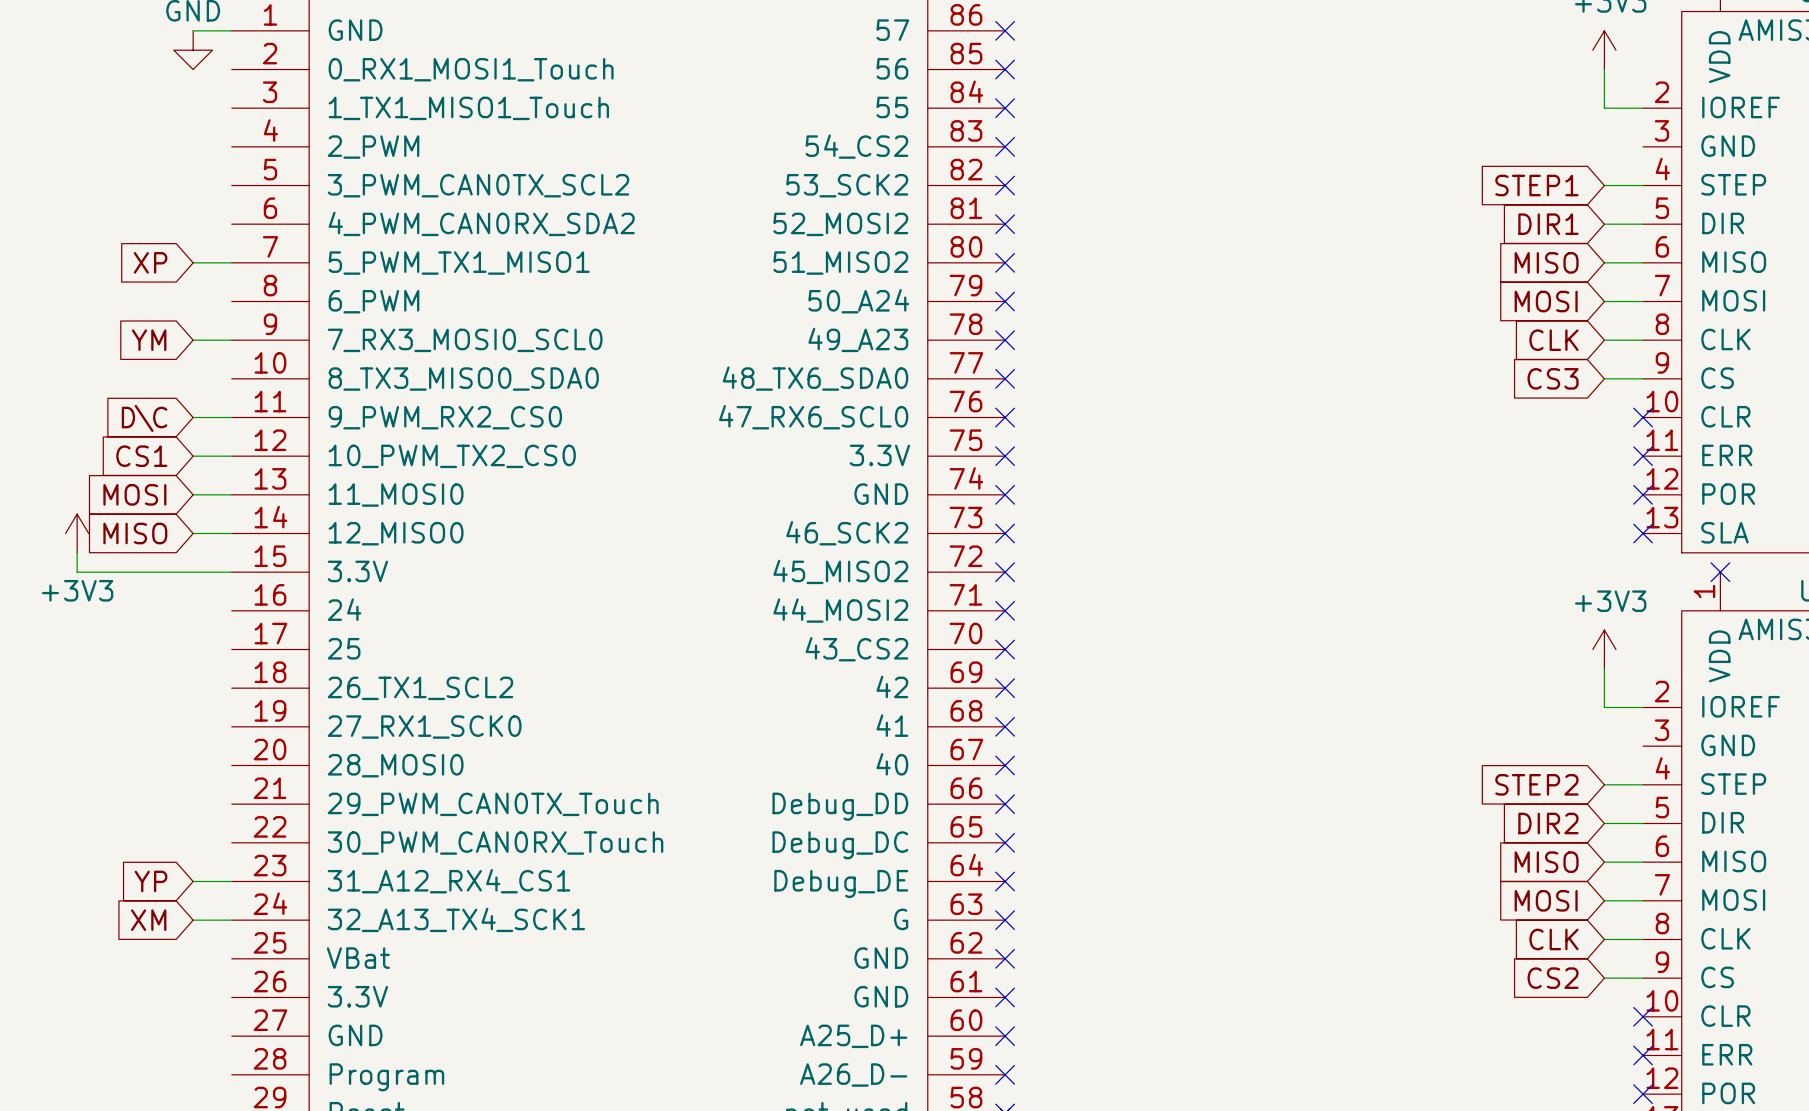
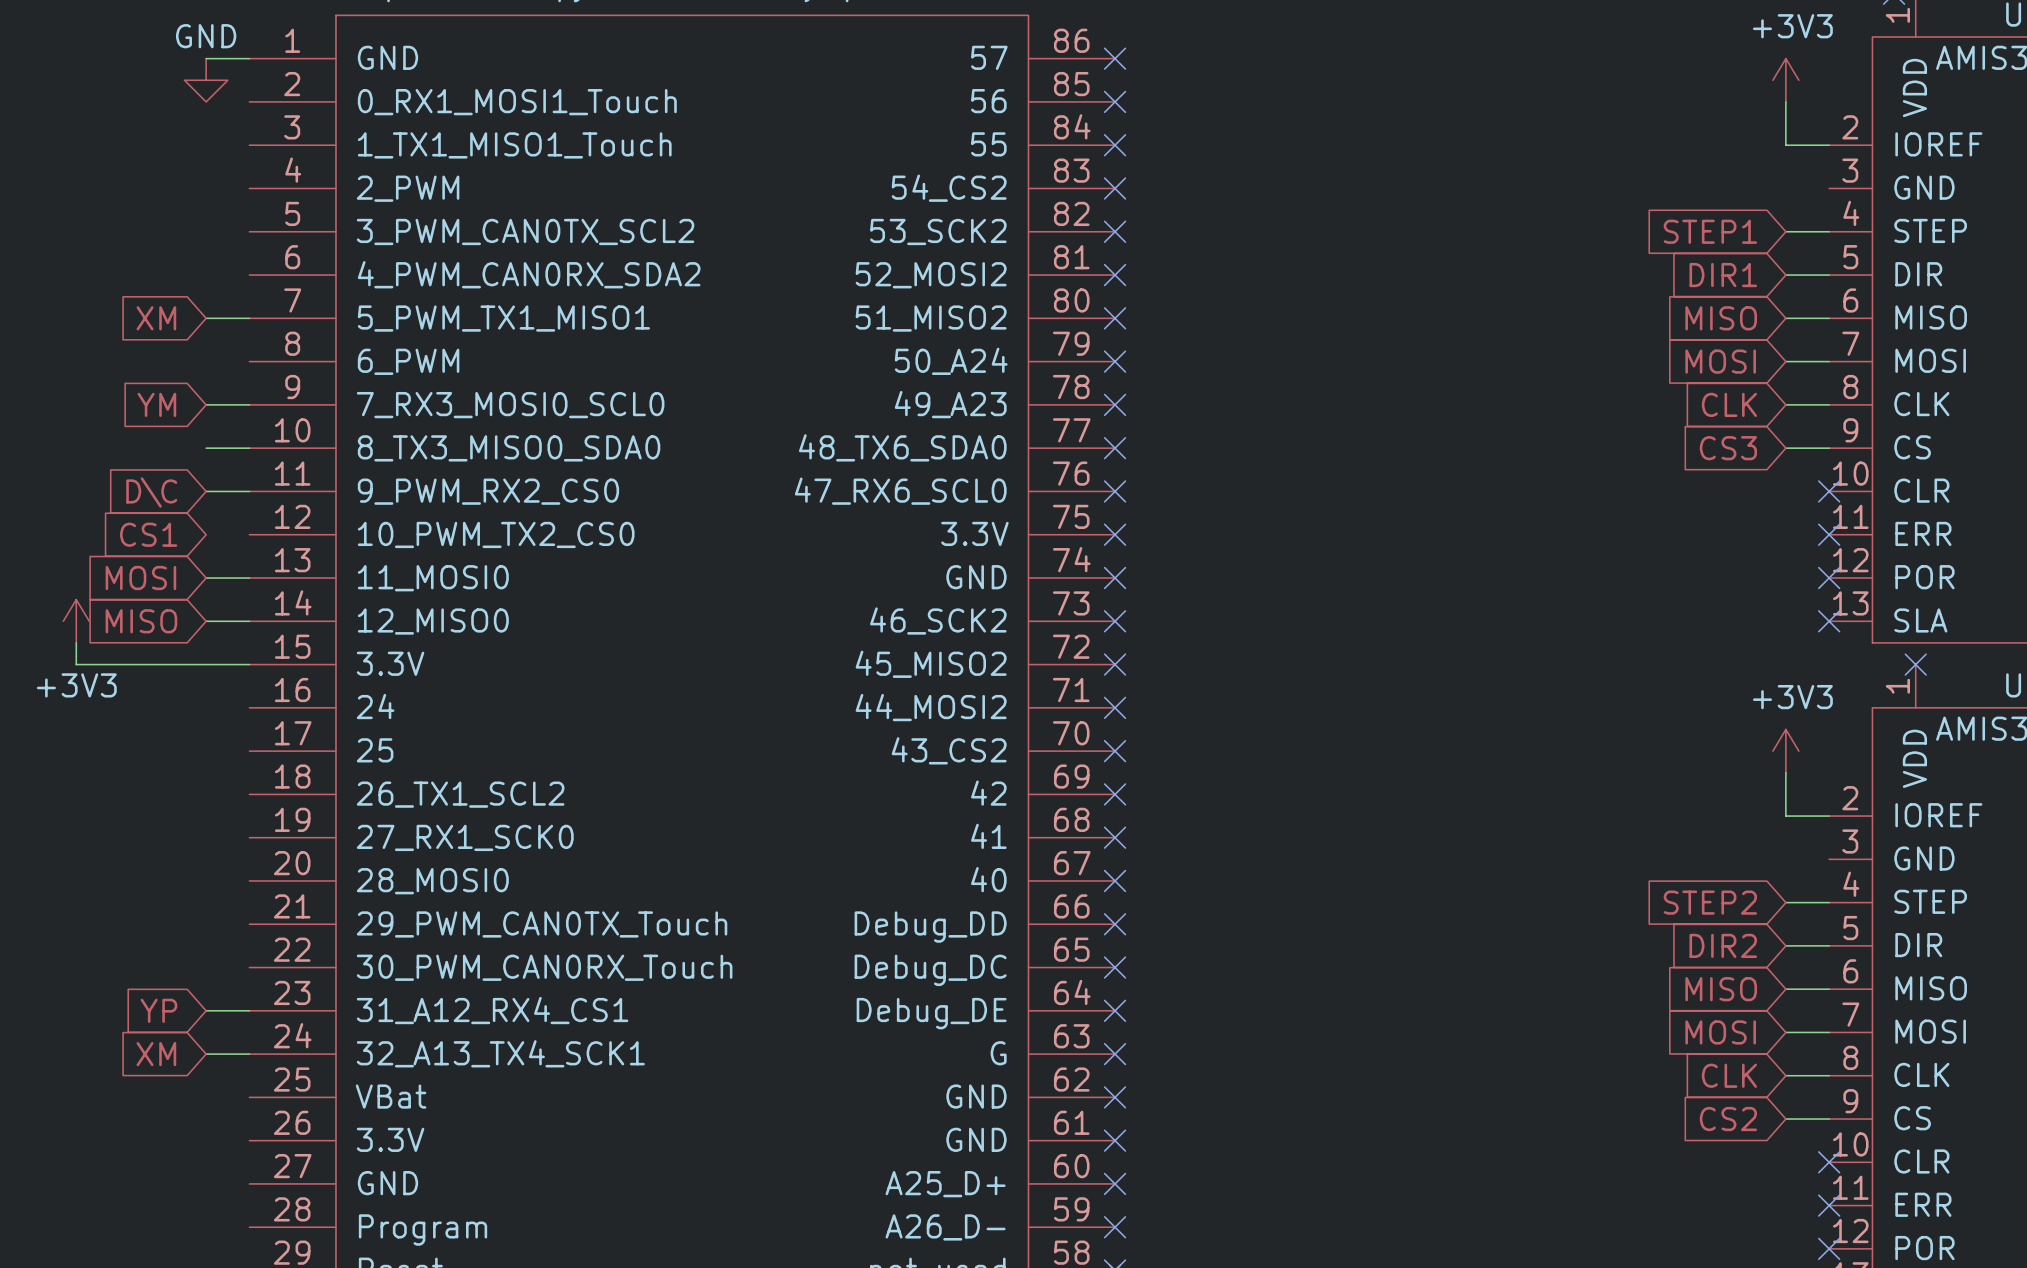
global label: XP (150, 262) -> XM (156, 318)
wire: (193, 456) (231, 456) -> (206, 448) (249, 448)

